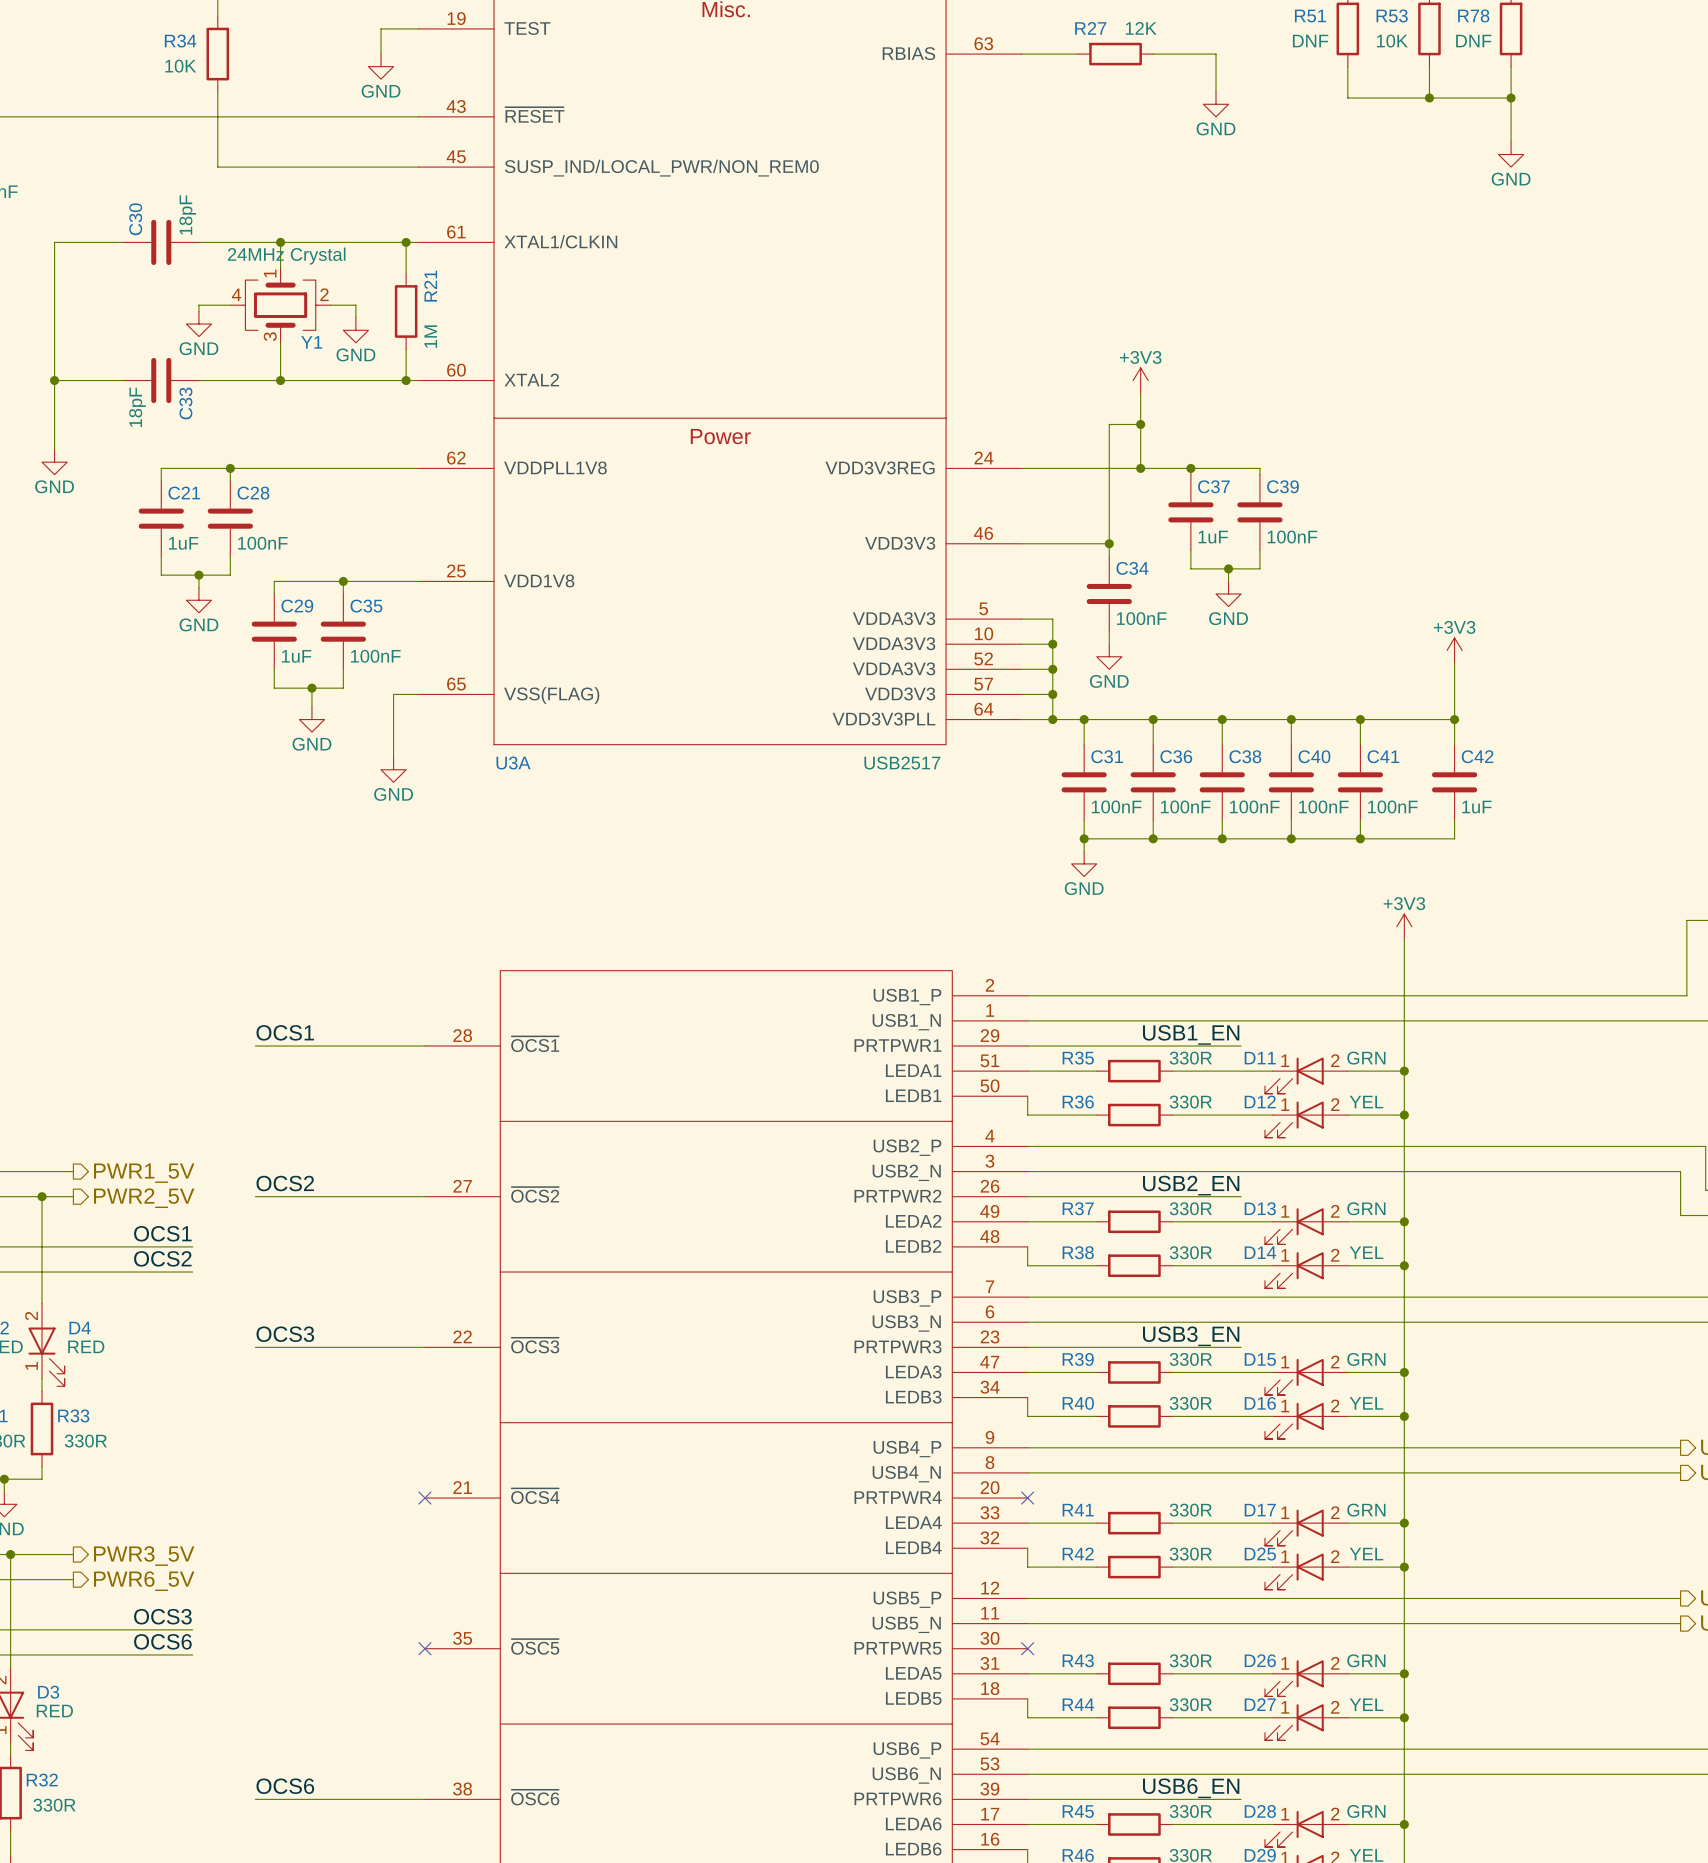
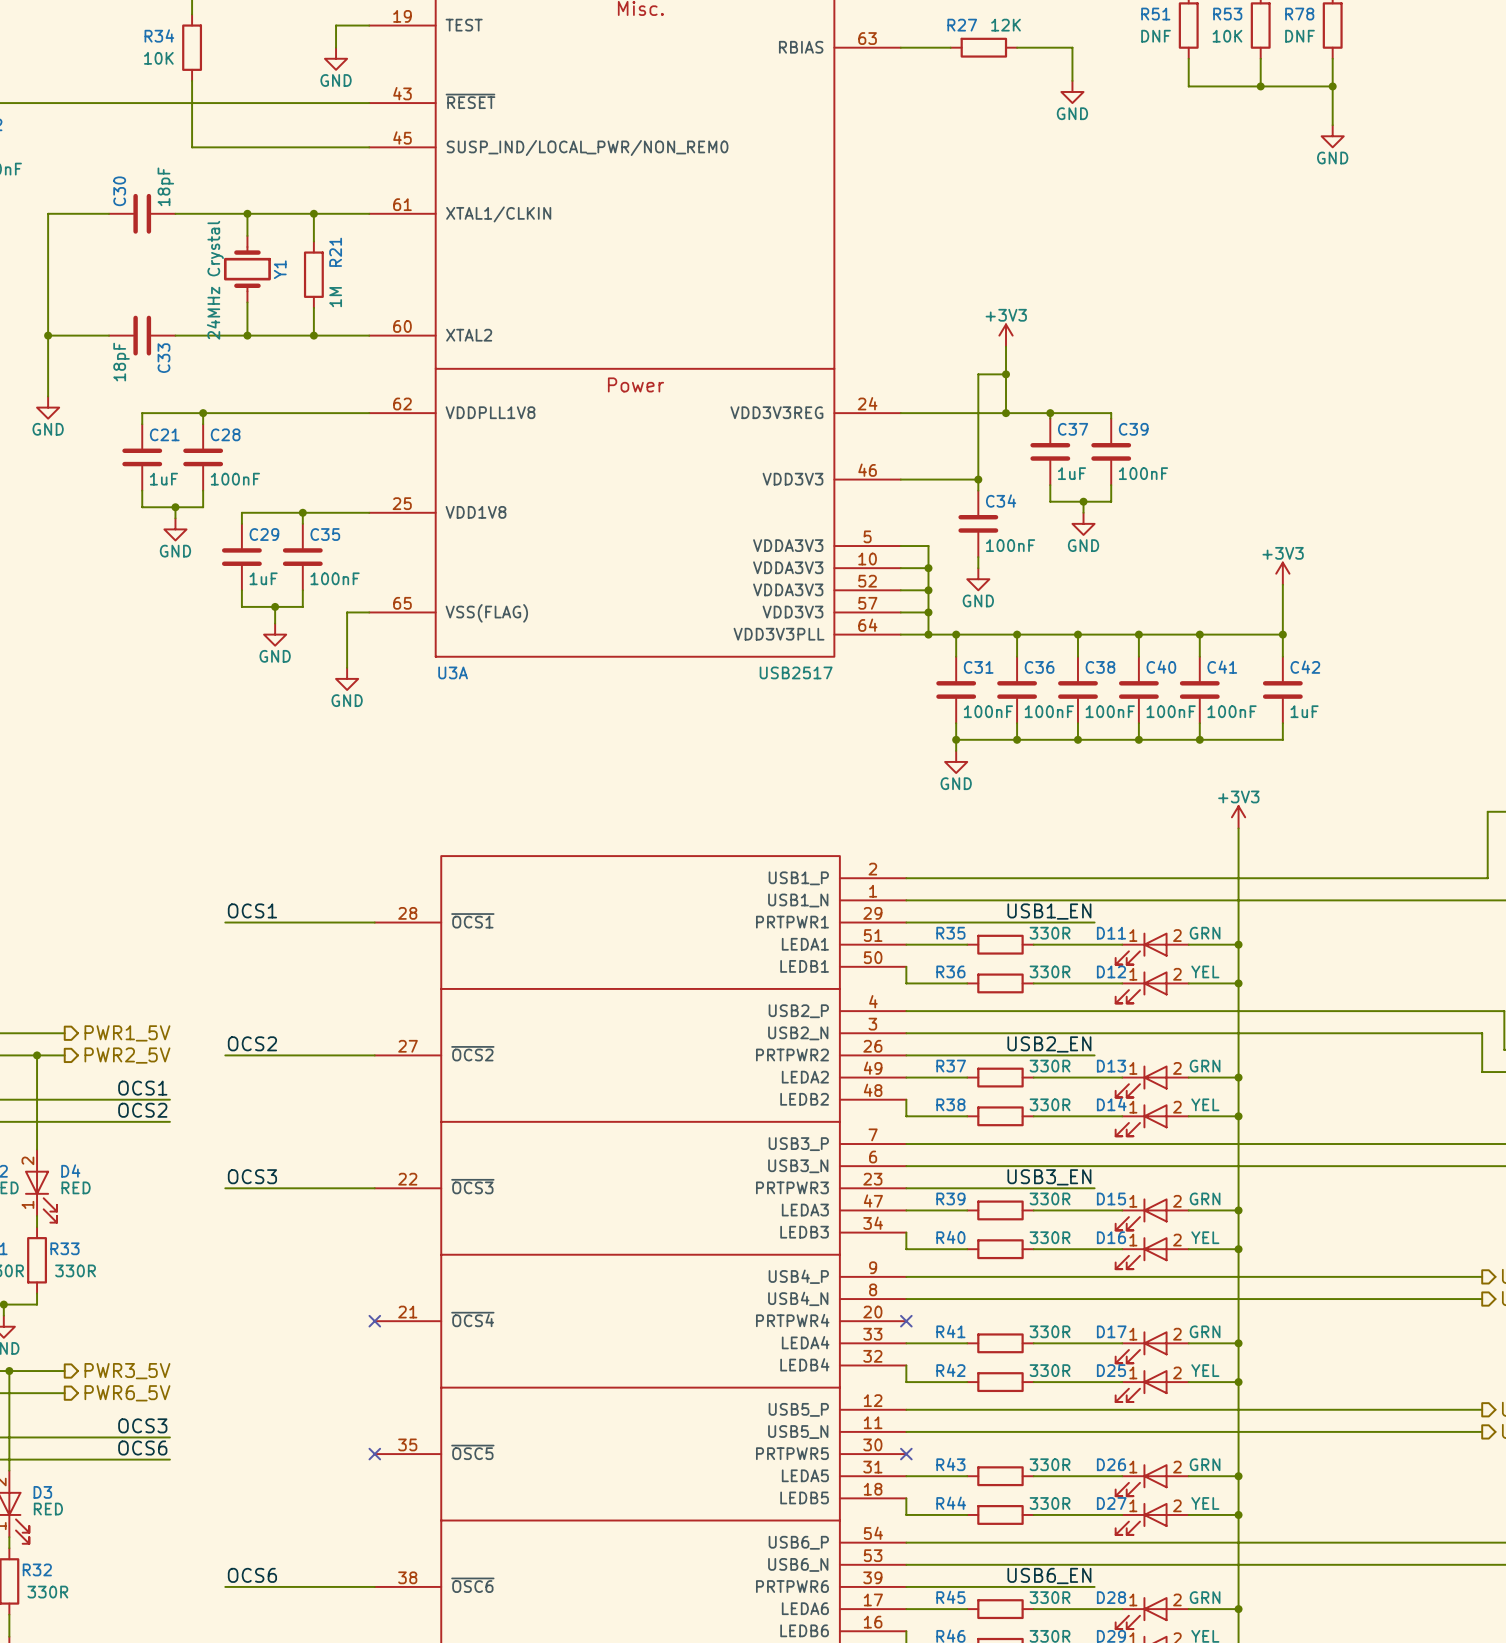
wire: (406, 242) (406, 273) -> (313, 213) (313, 241)
junction position: (406, 242) -> (313, 213)
Y1 value position: 24MHz Crystal (286, 256) -> 24MHz Crystal (215, 280)
Y1 symbol: [230, 267, 331, 343] -> [223, 235, 271, 303]
wire: (230, 305) (198, 305) (198, 311) -> none
wire: (330, 305) (355, 305) (355, 317) -> none
R21 position: (406, 311) -> (313, 274)
power symbol: GND (198, 324) -> none
power symbol: GND (355, 330) -> none
Y1 name position: Y1 (311, 342) -> Y1 (280, 269)
wire: (406, 349) (406, 380) -> (313, 307) (313, 335)
junction position: (406, 380) -> (313, 335)

